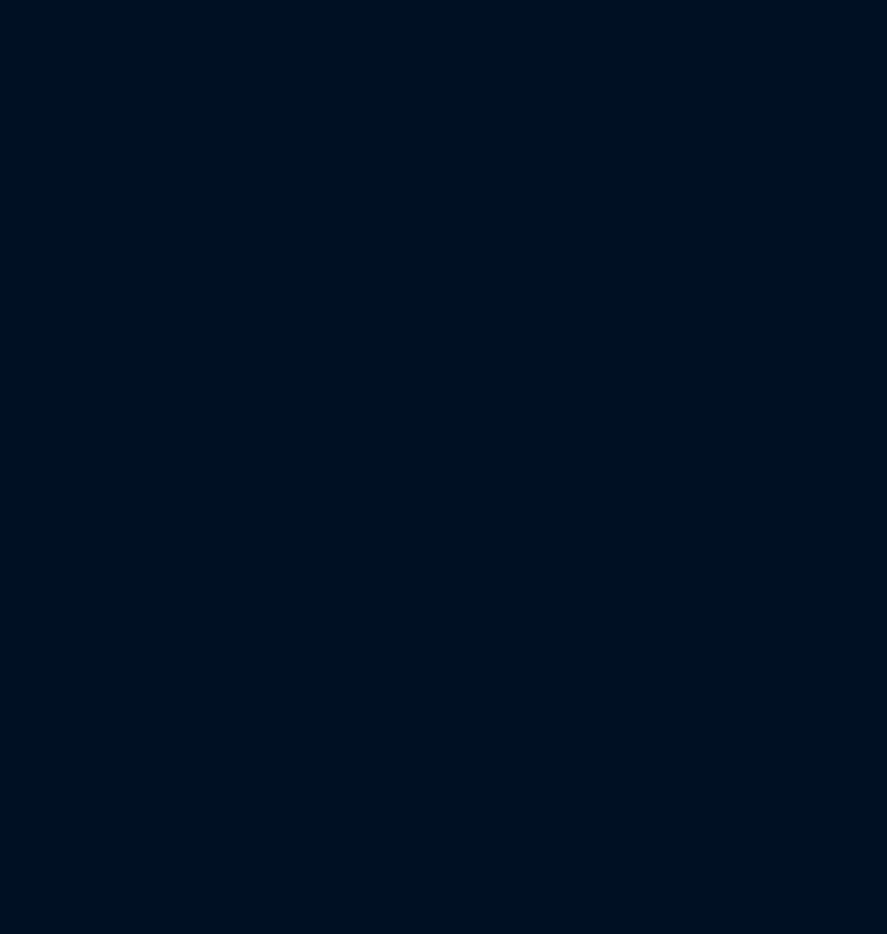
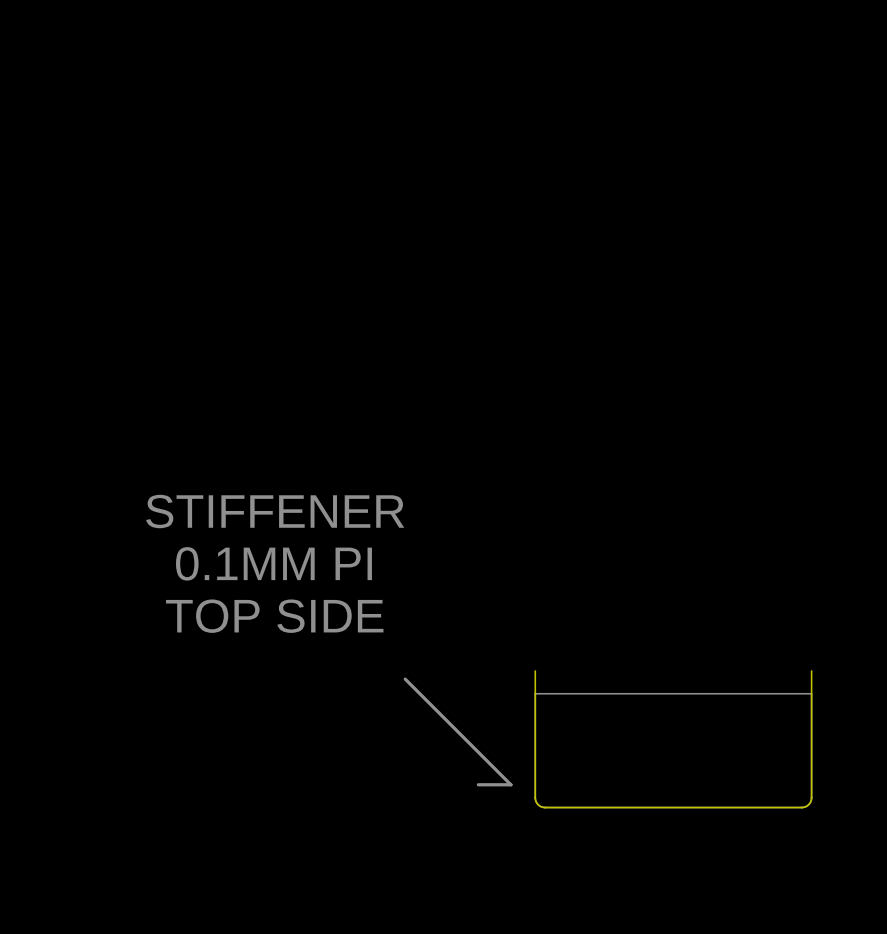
text: none -> STIFFENER (275, 511)
text: none -> 0.1MM PI (273, 563)
text: none -> TOP SIDE (274, 616)
line: none -> (405, 679) (510, 784) (478, 784)
part: none -> (673, 739)

